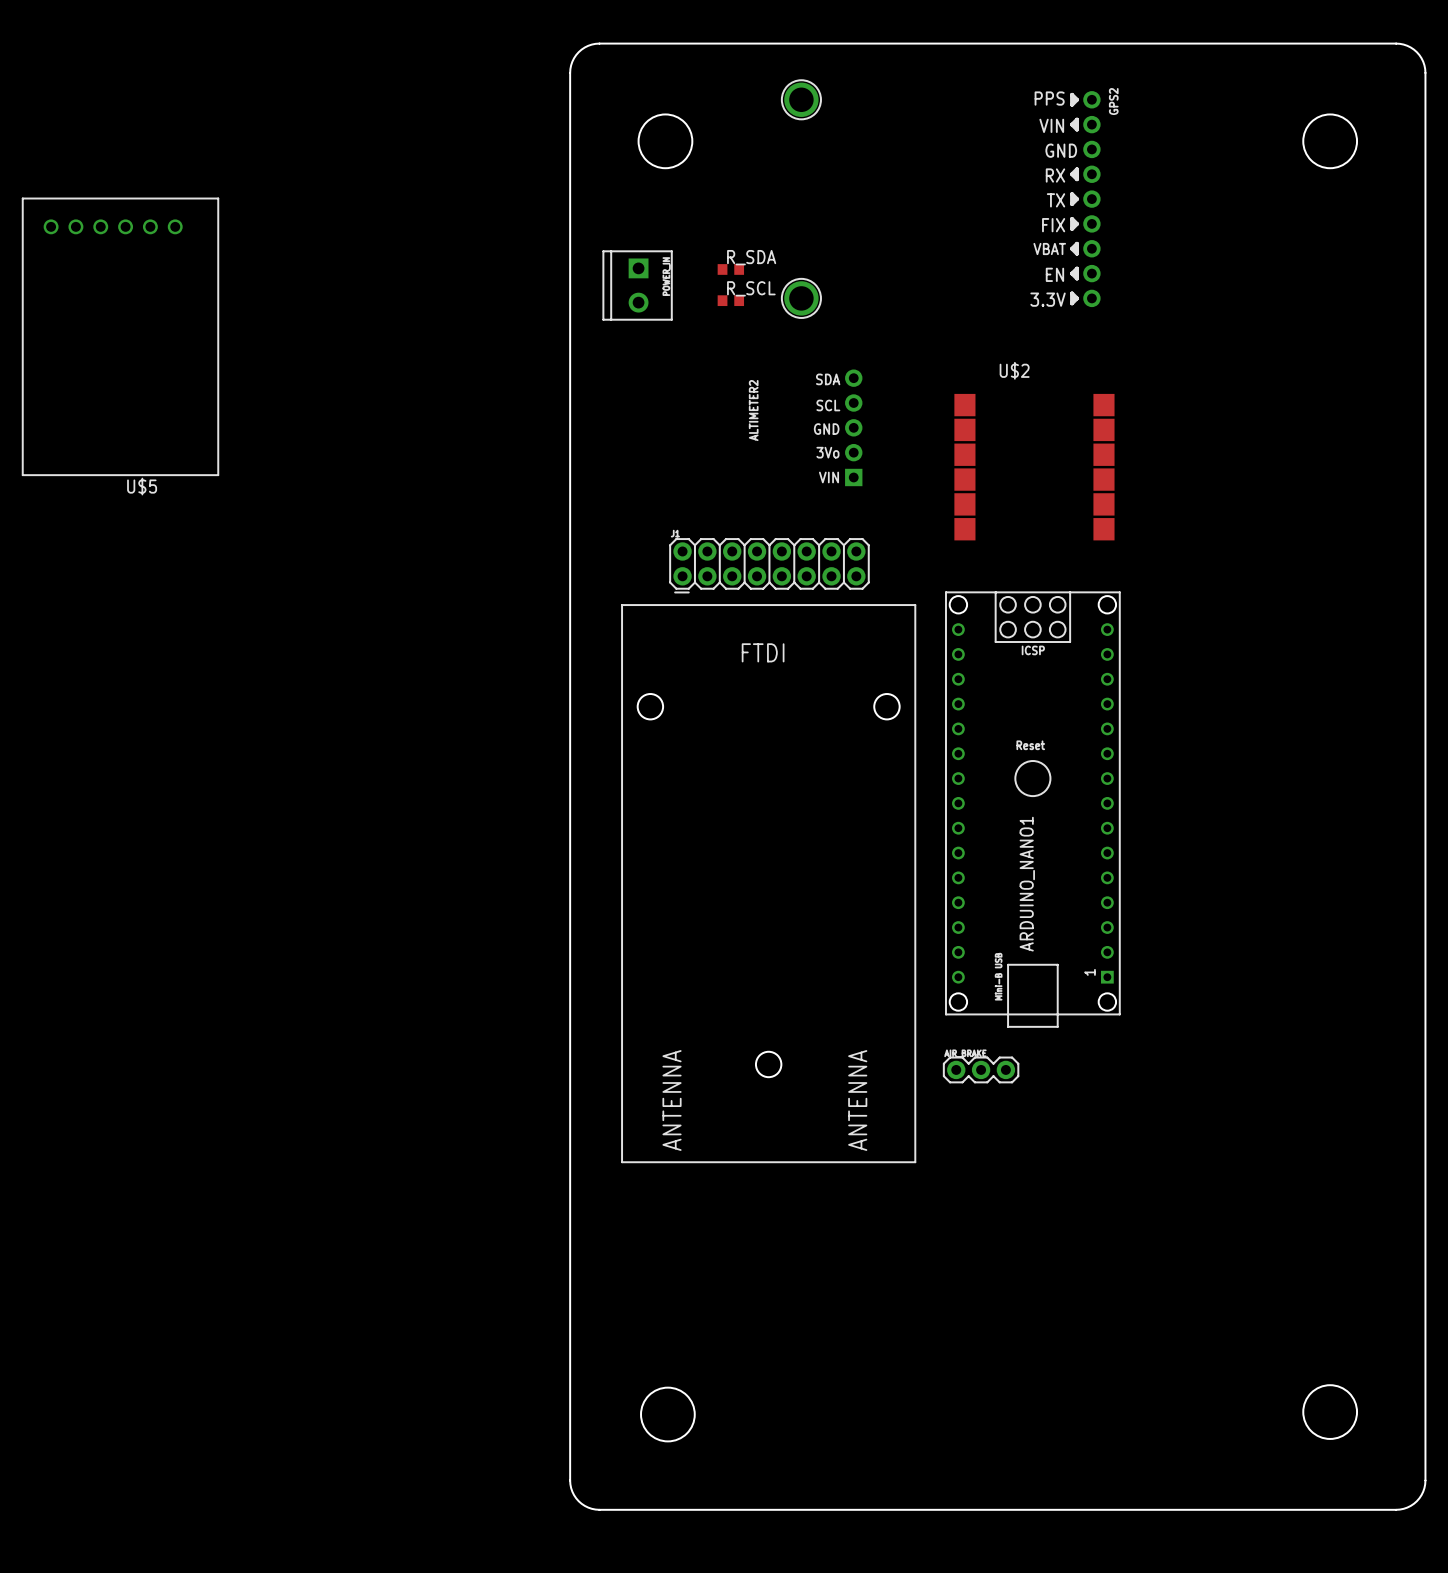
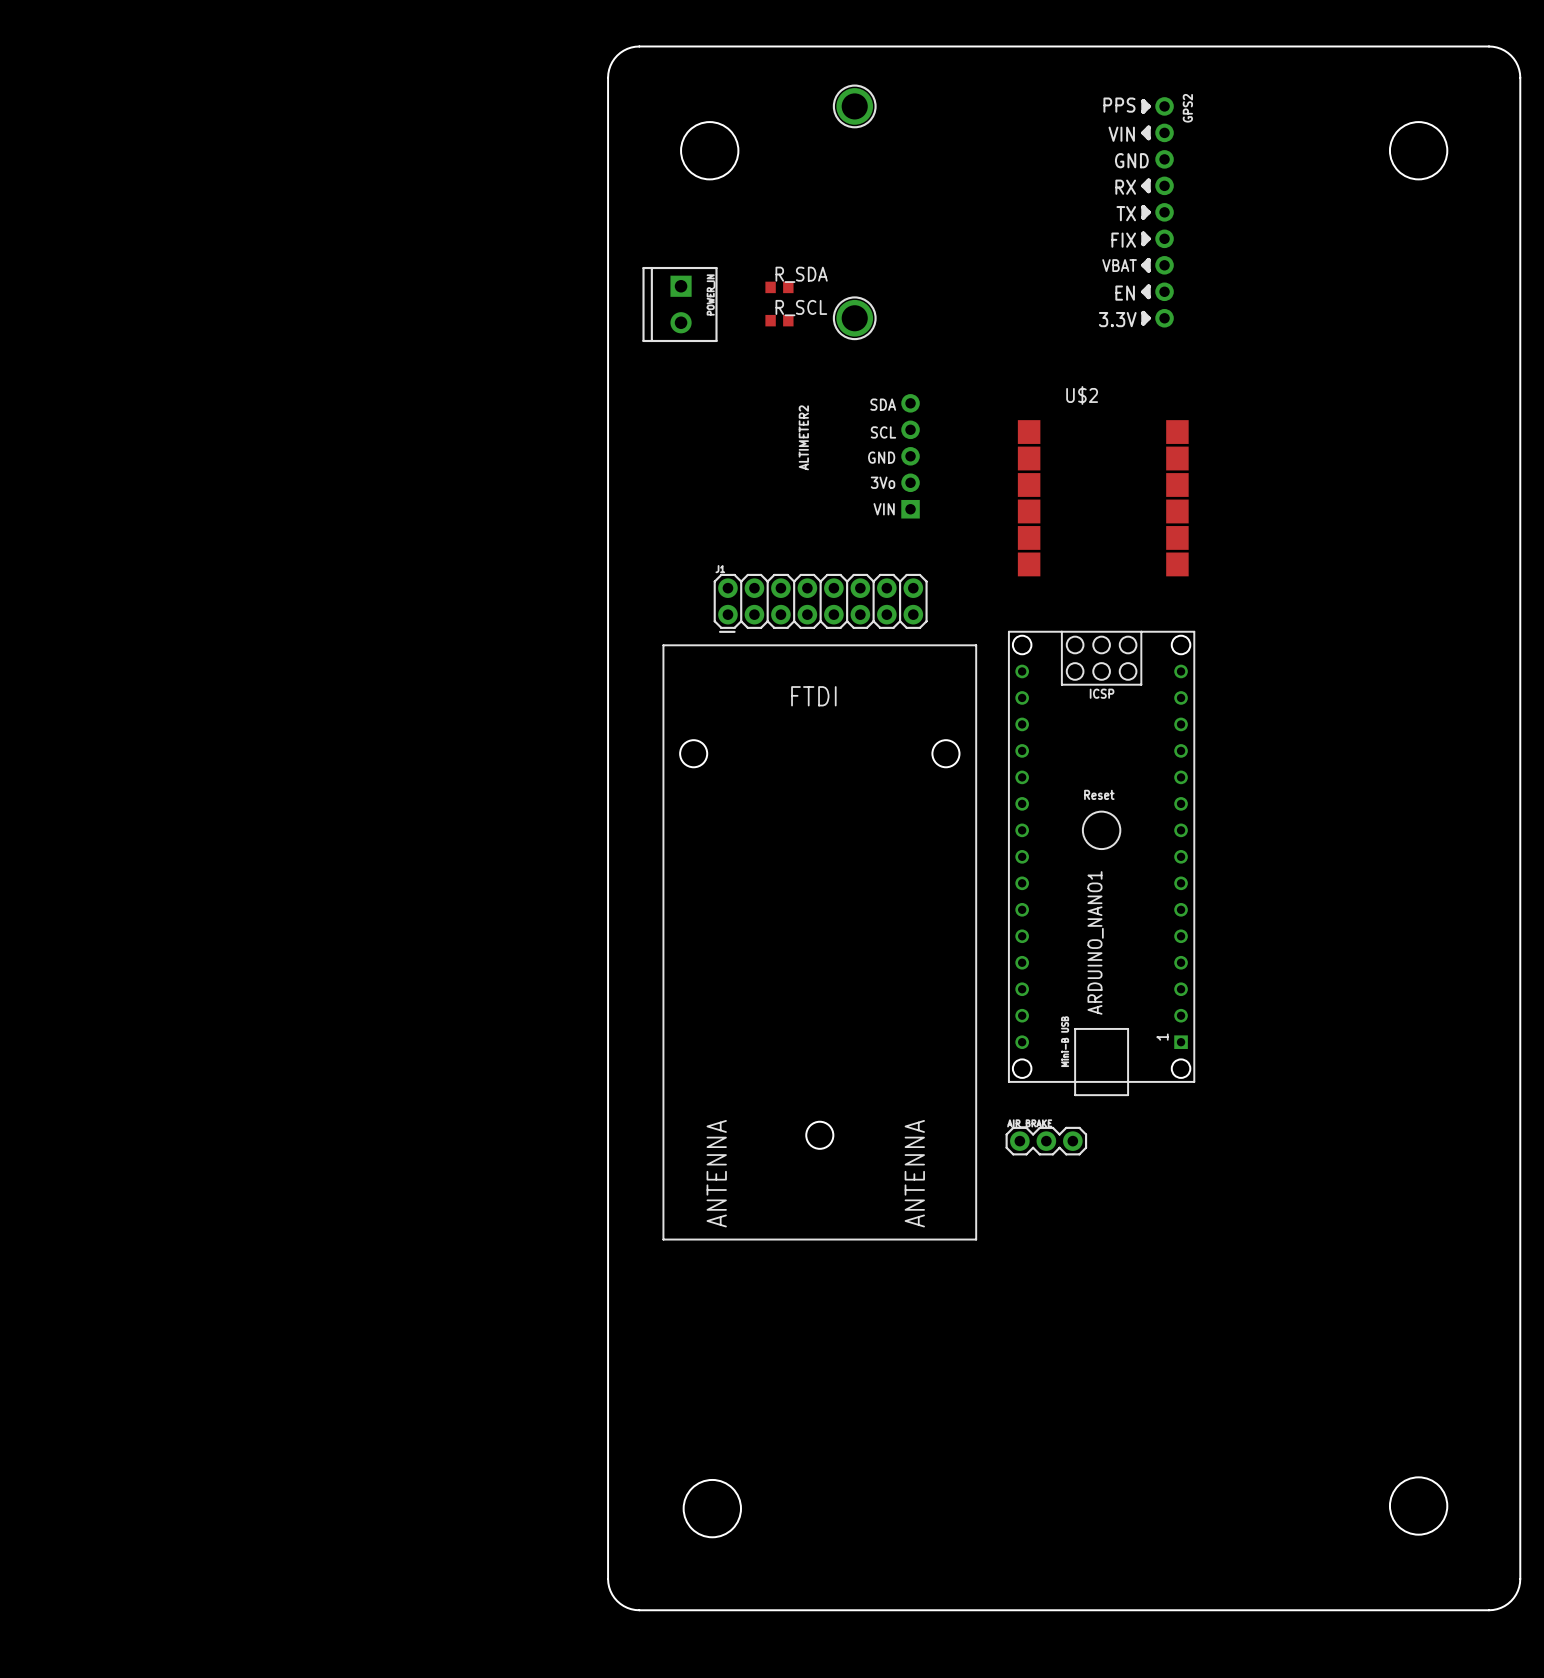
U$5: (120, 336) -> none

